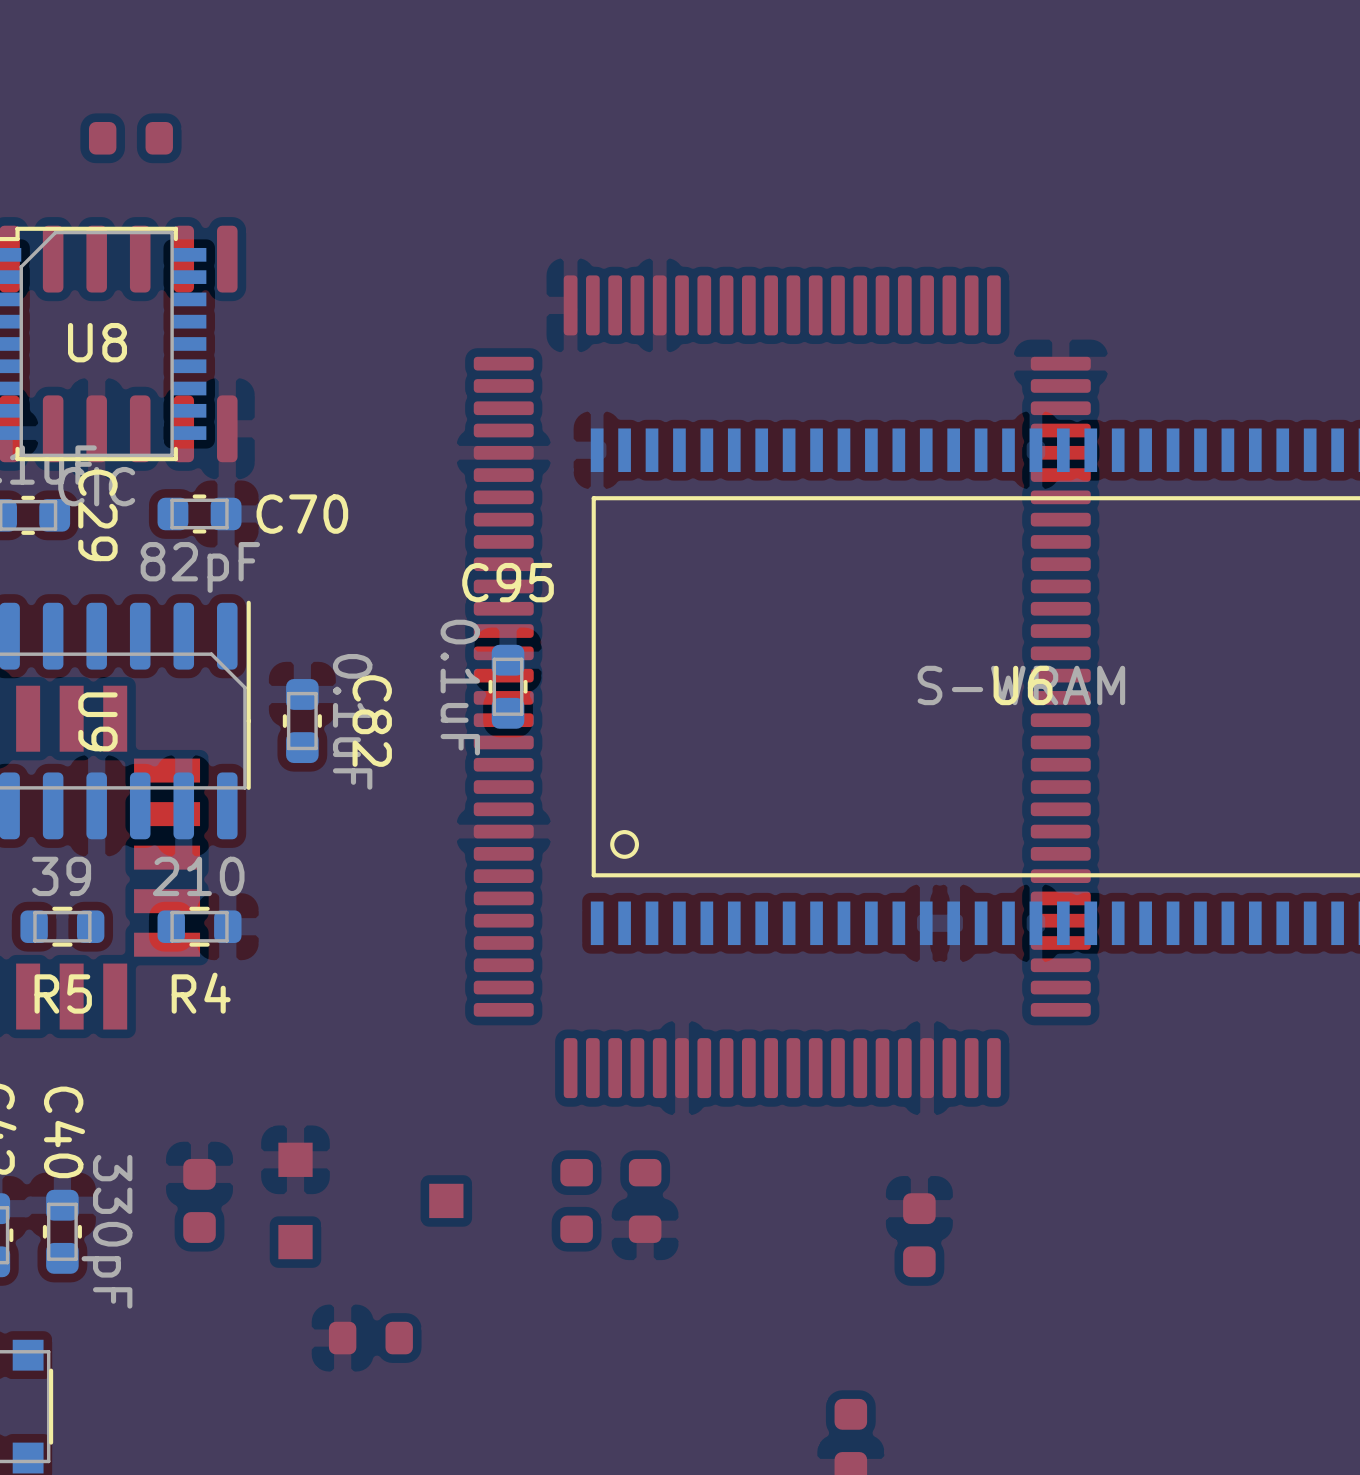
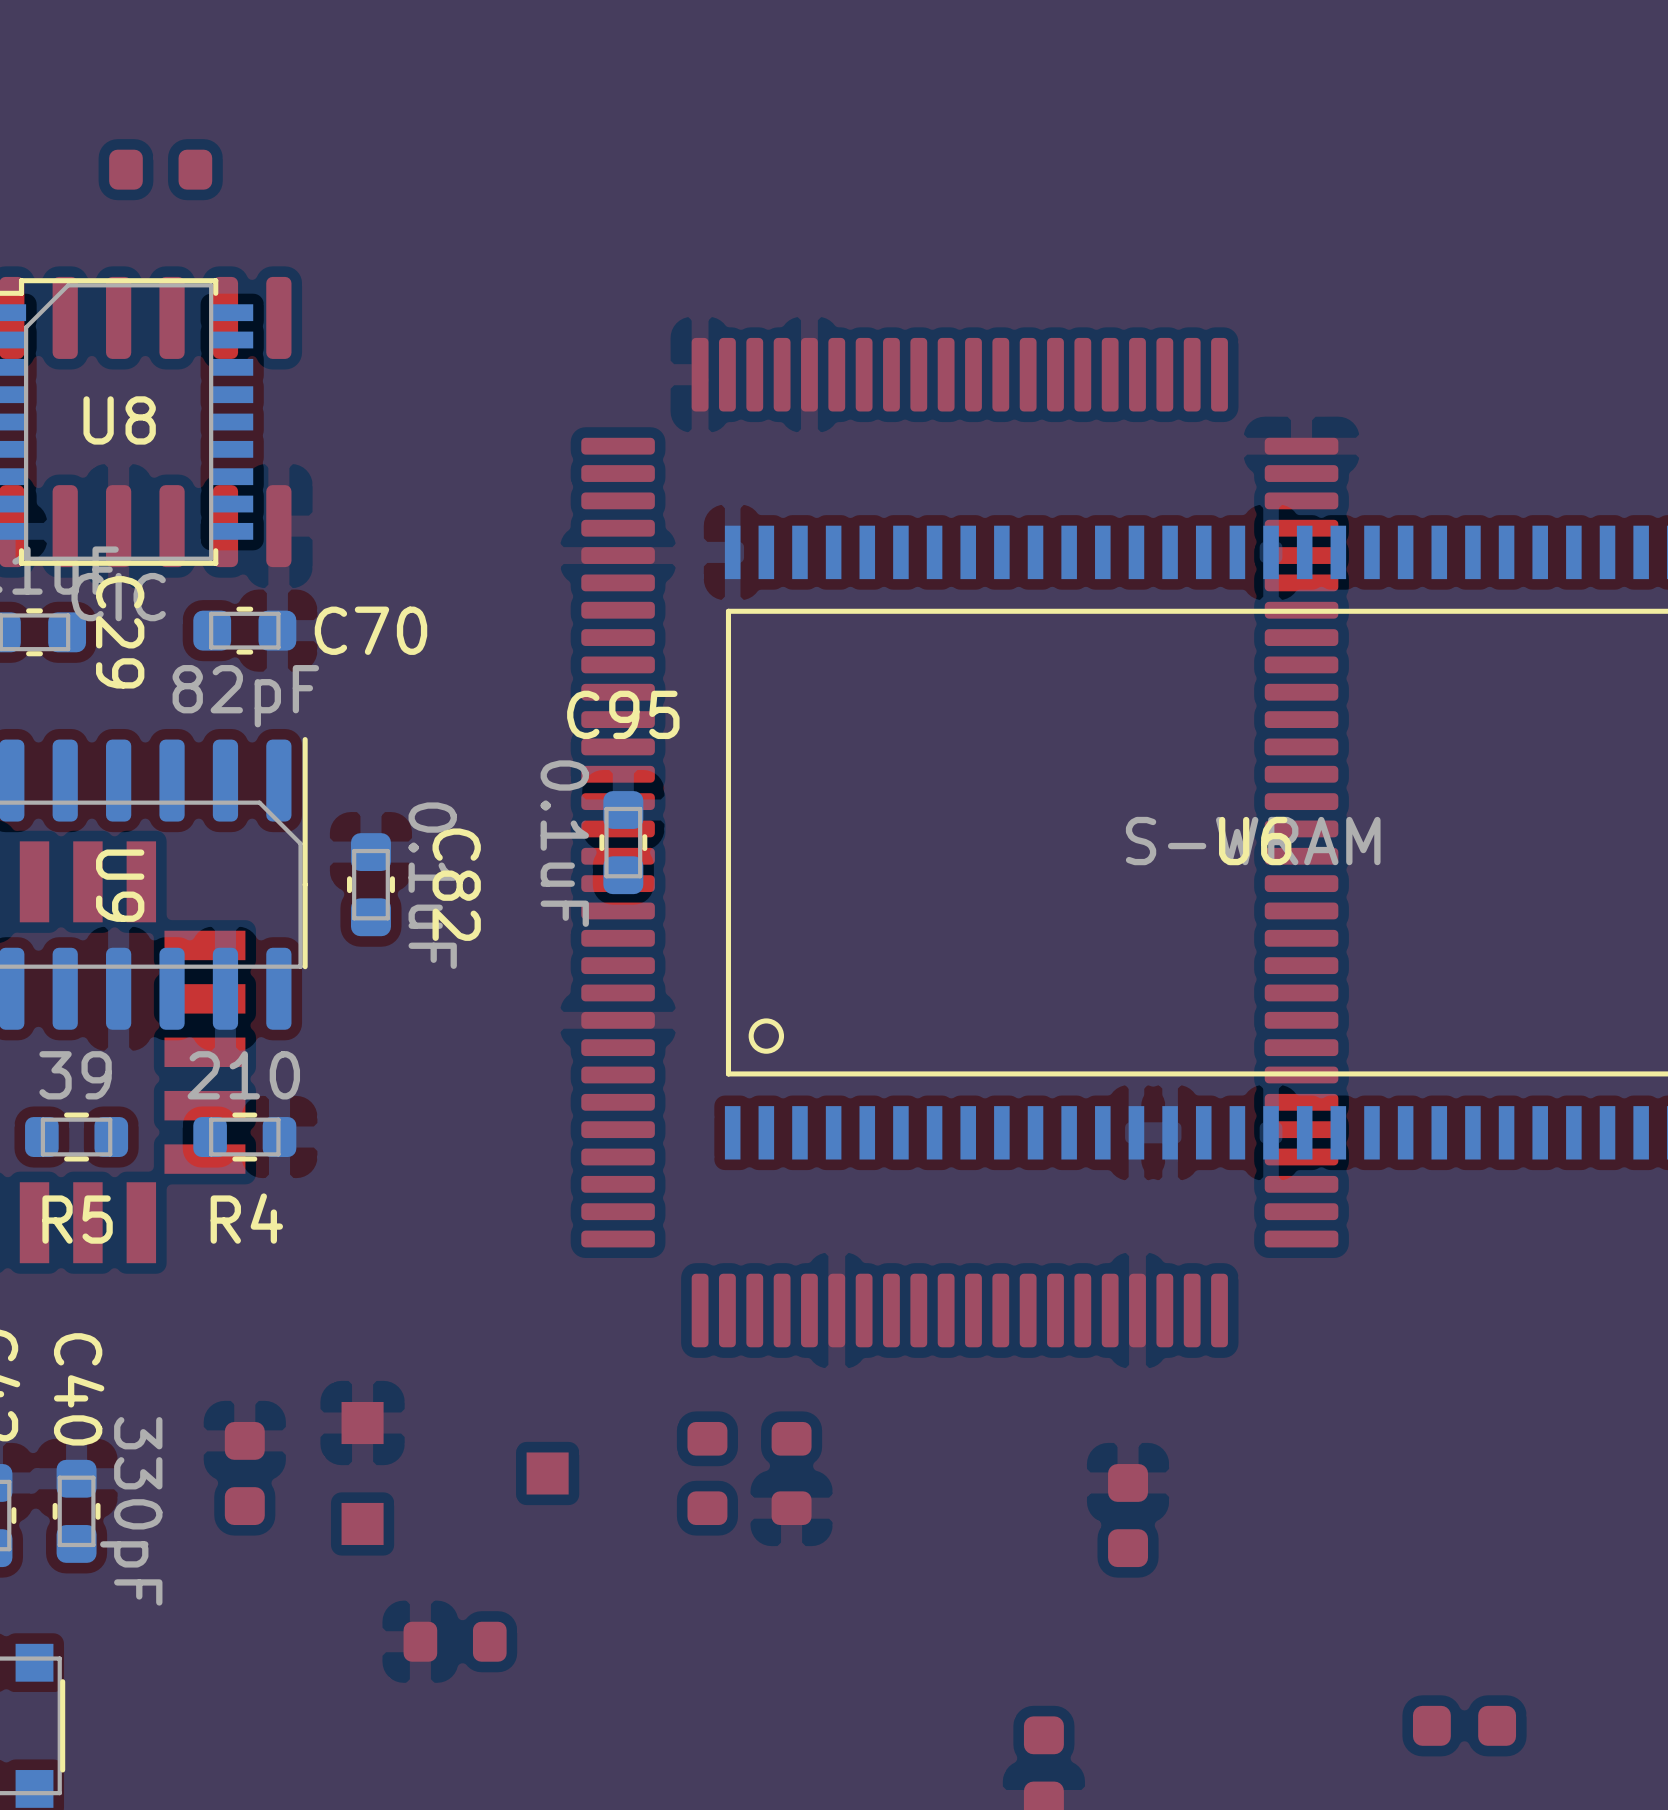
part: none -> (1464, 1725)

